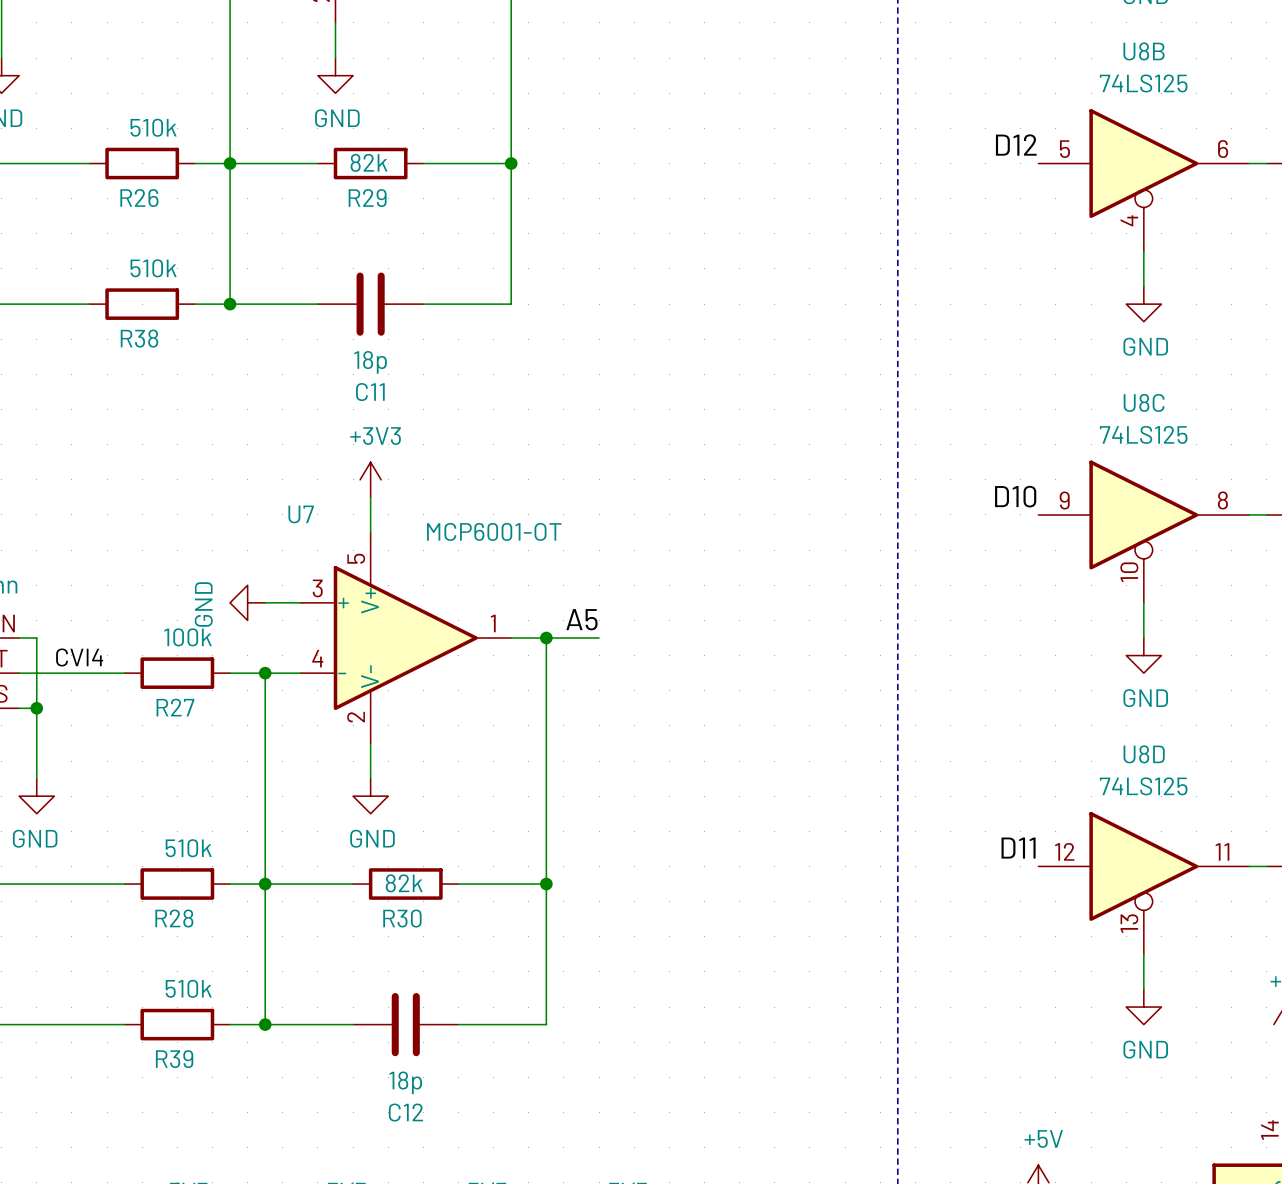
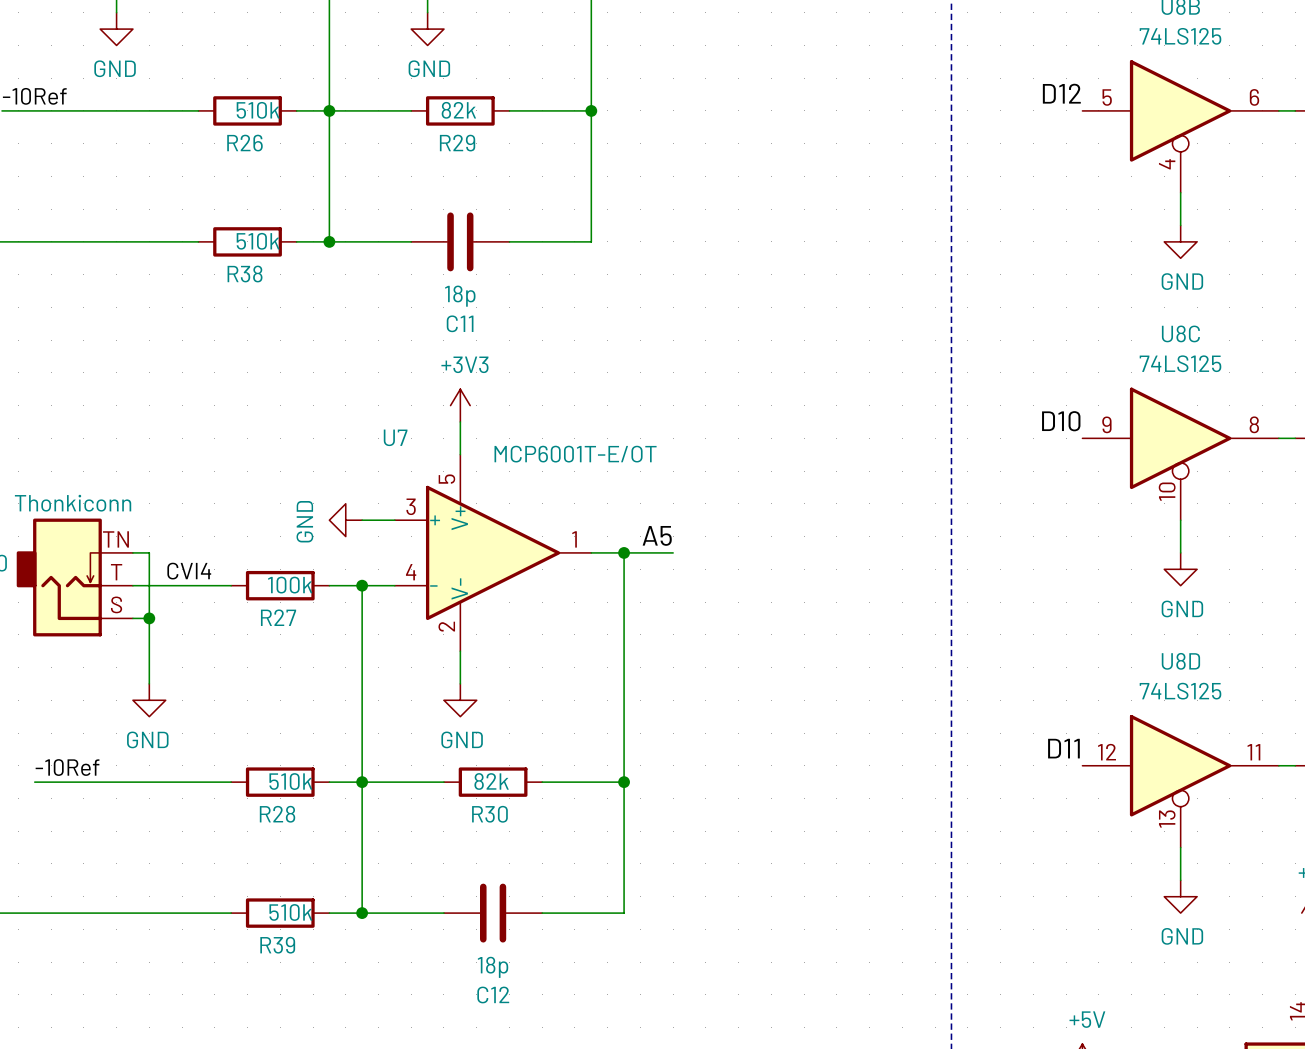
R26 value position: 510k (153, 127) -> 510k (258, 110)
R38 value position: 510k (153, 268) -> 510k (258, 241)
U7 value: MCP6001-OT (494, 531) -> MCP6001T-E/OT (575, 454)
R27 value position: 100k (187, 637) -> 100k (290, 585)
R28 value position: 510k (188, 848) -> 510k (290, 781)
R39 value position: 510k (188, 988) -> 510k (290, 912)

